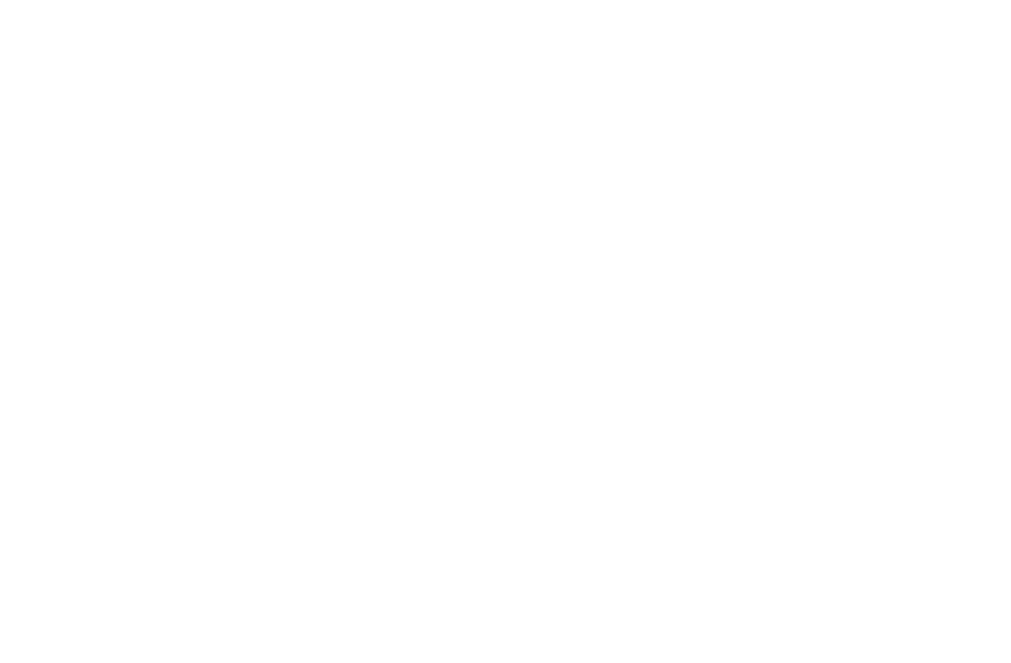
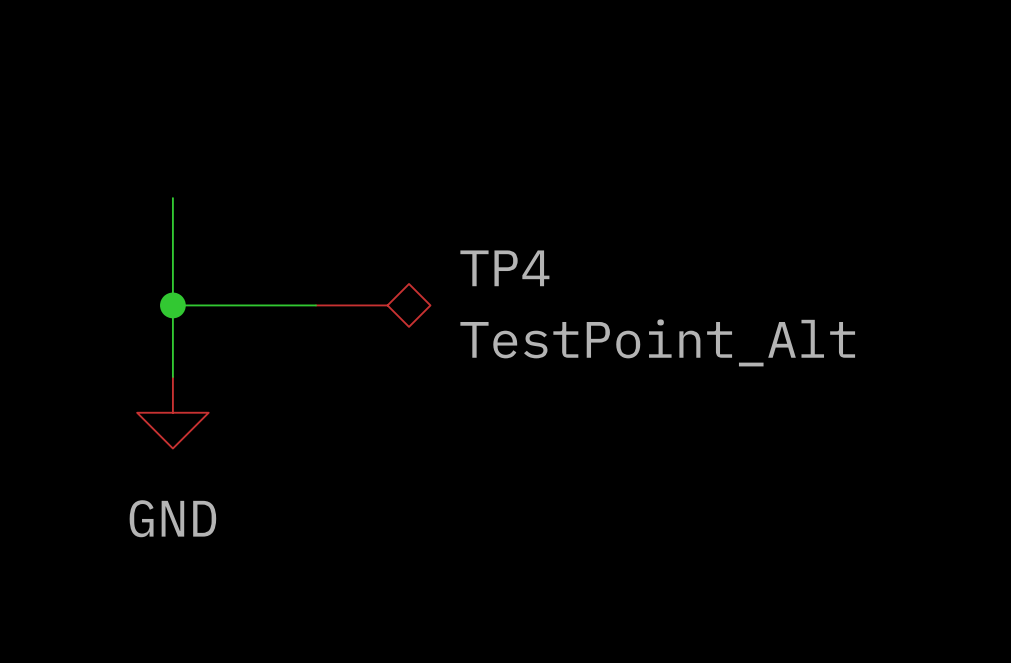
wire: none -> (172, 198) (172, 376)
wire: none -> (172, 305) (316, 305)
junction: none -> (172, 305)
TP4: none -> TestPoint_Alt (373, 305)
power symbol: none -> GND (172, 412)

